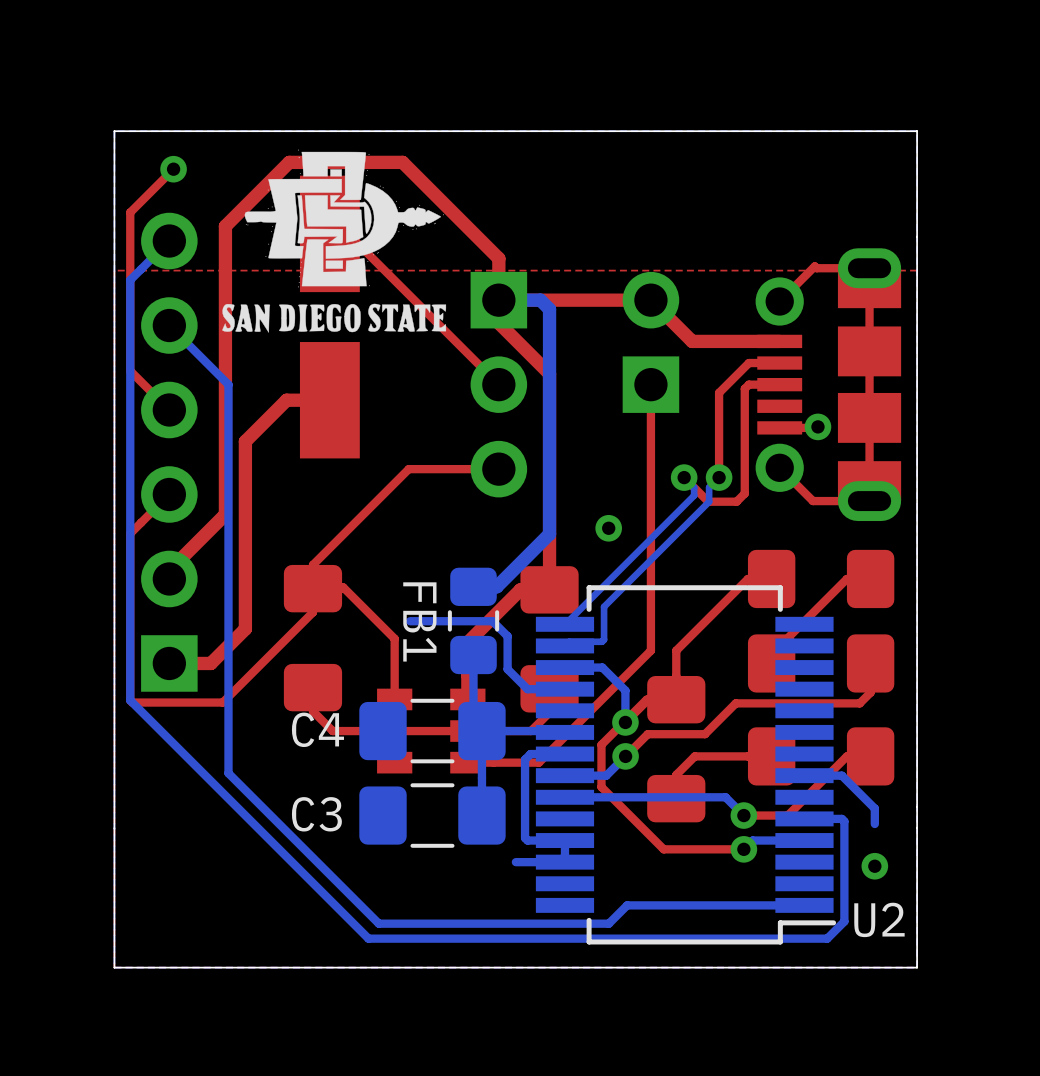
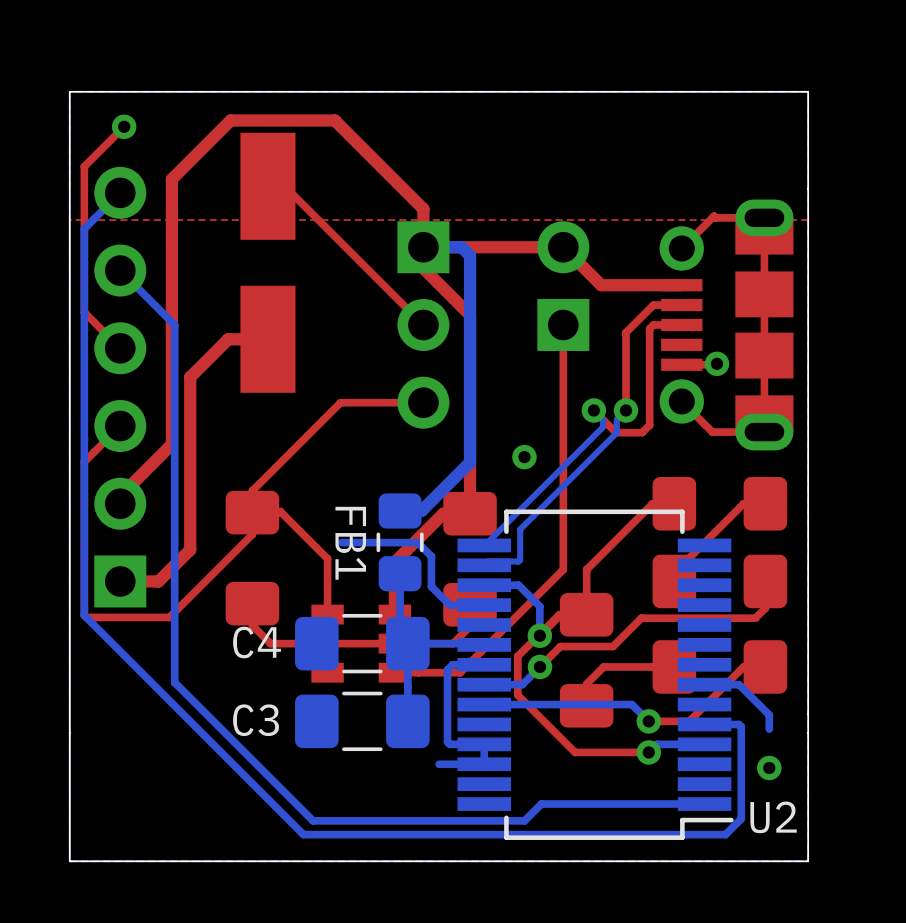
drawing: [222, 149, 447, 333] -> none

